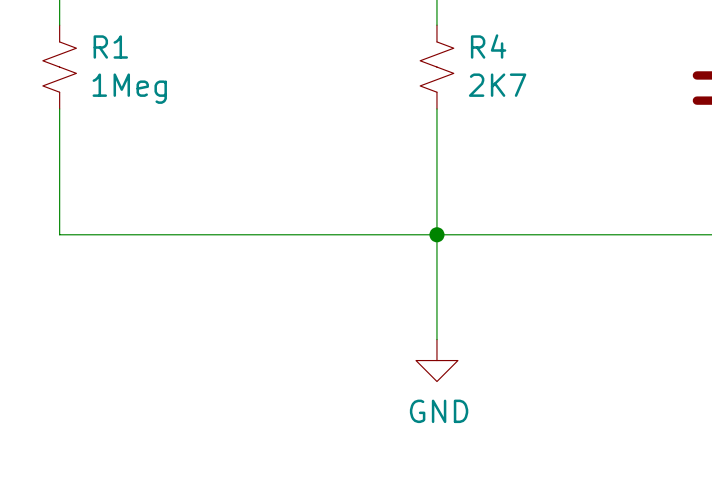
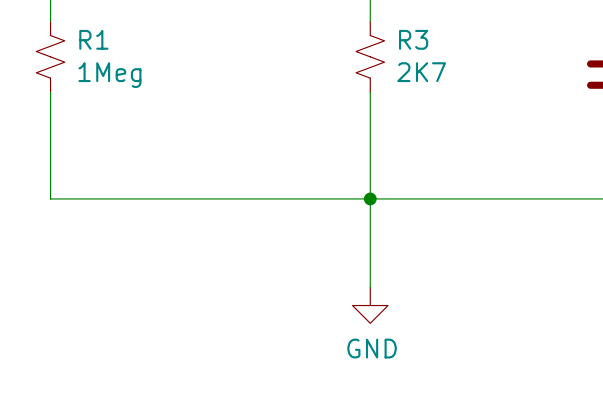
R4 name: R4 (488, 46) -> R3 (413, 39)

